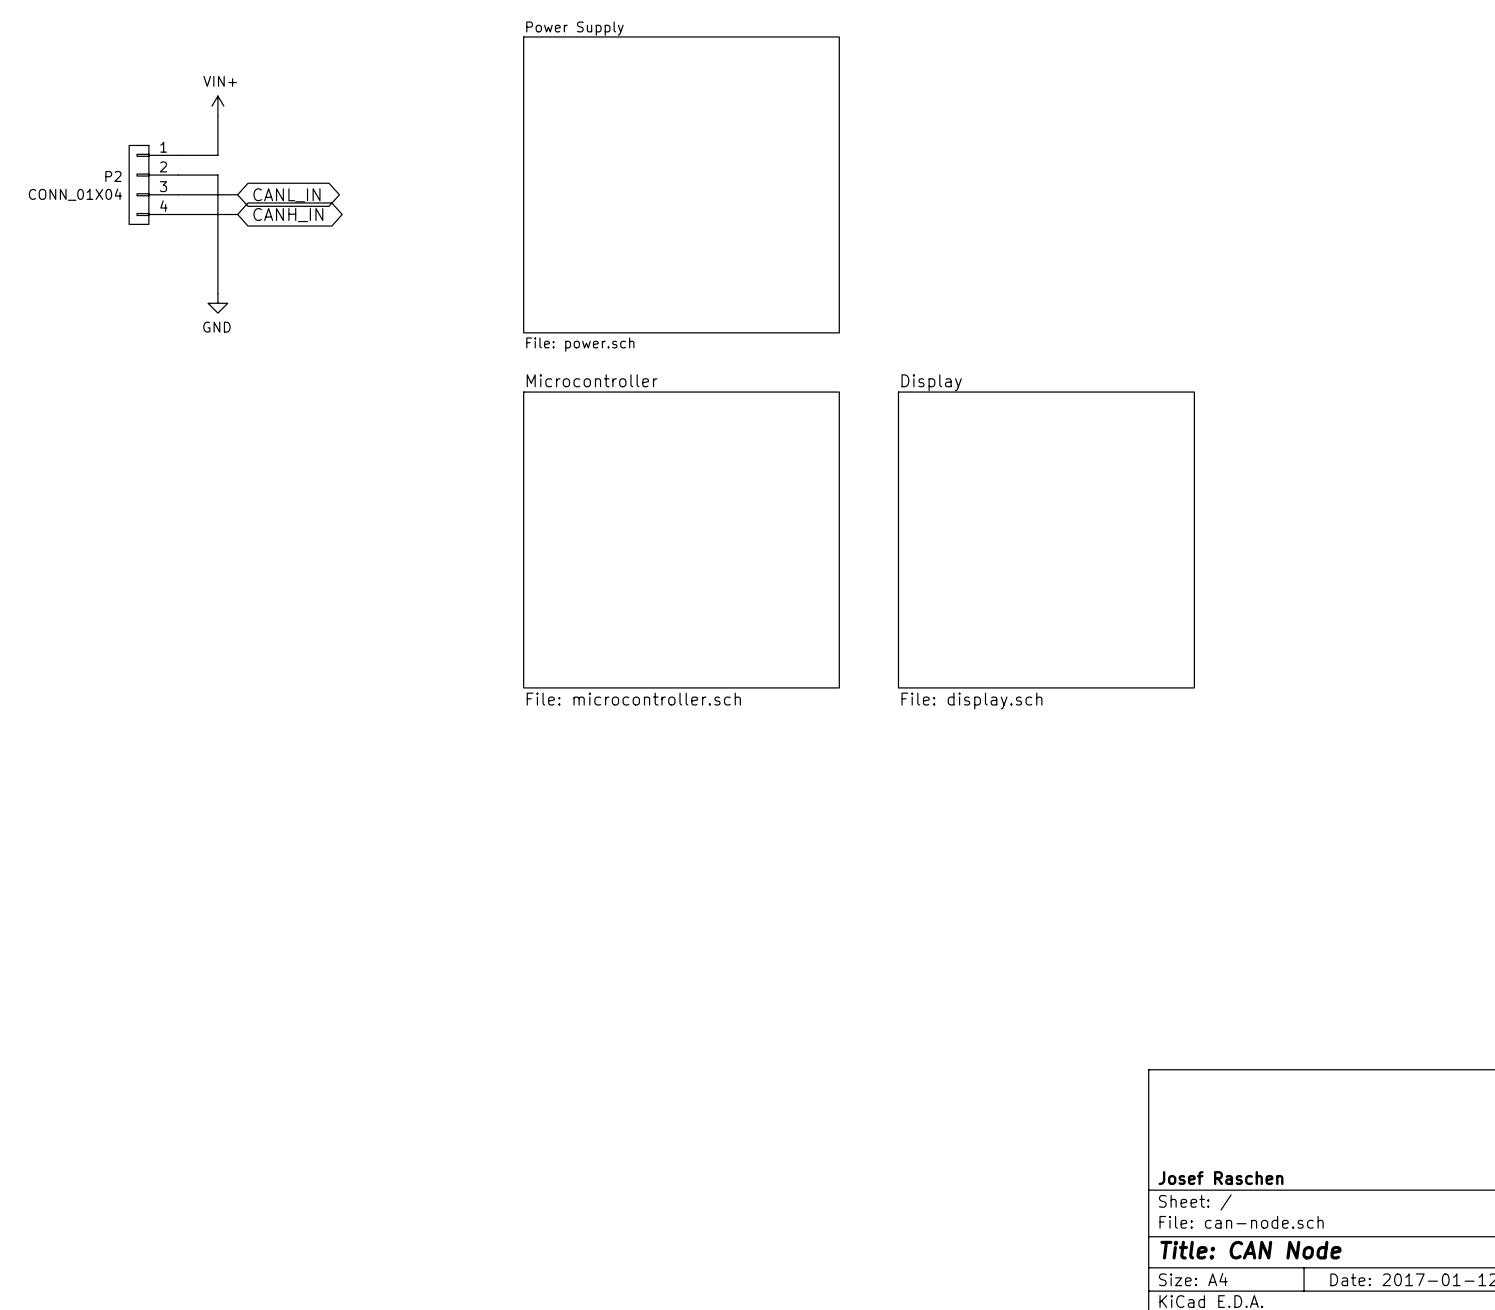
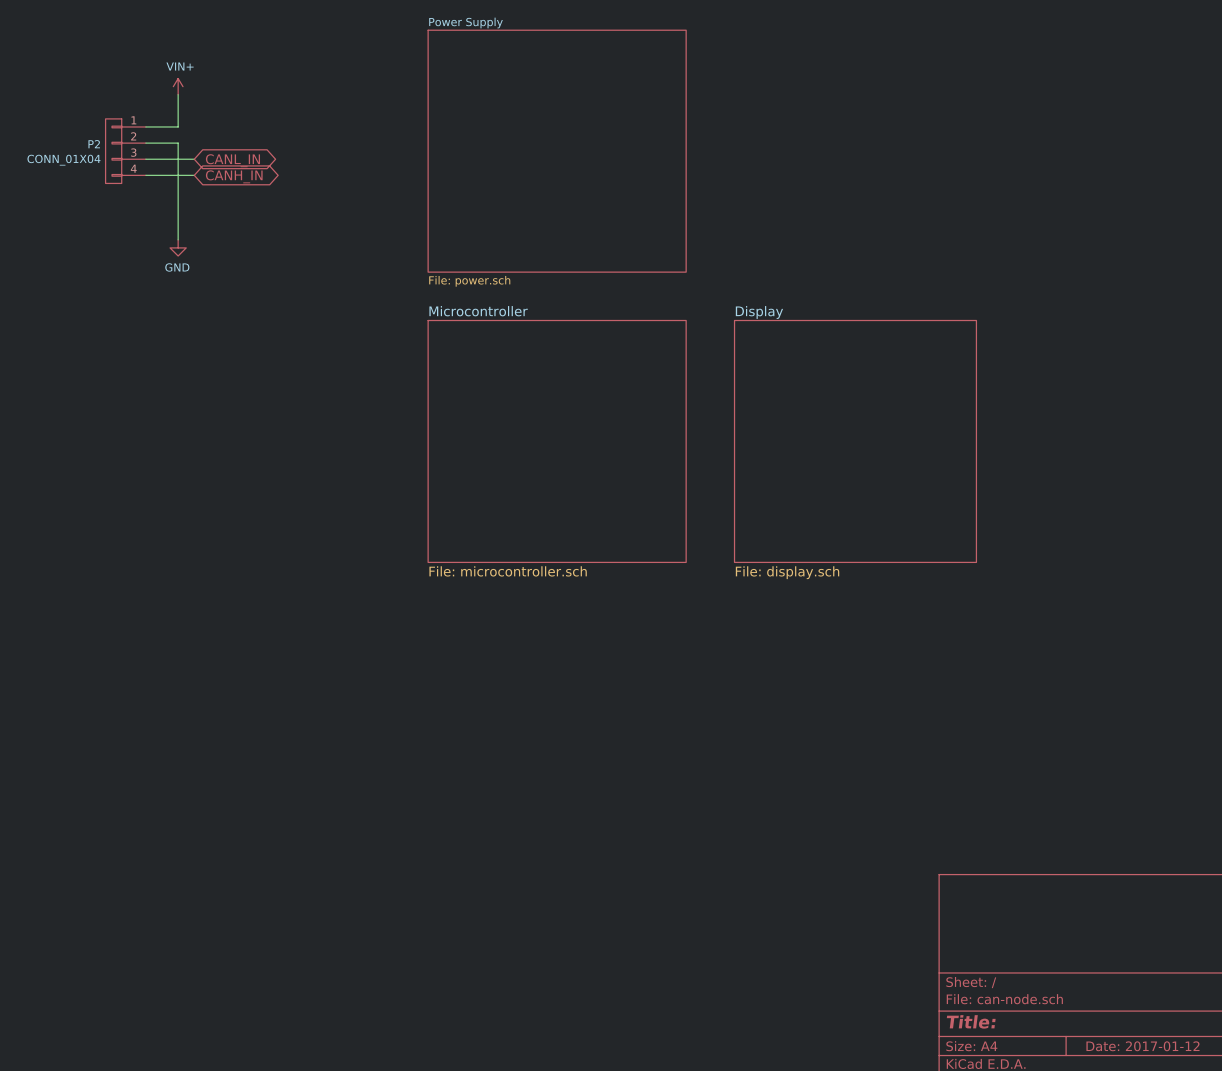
title block: Josef Raschen (1220, 1178) -> none
title block: Title: CAN Node (1250, 1250) -> Title: (971, 1021)

